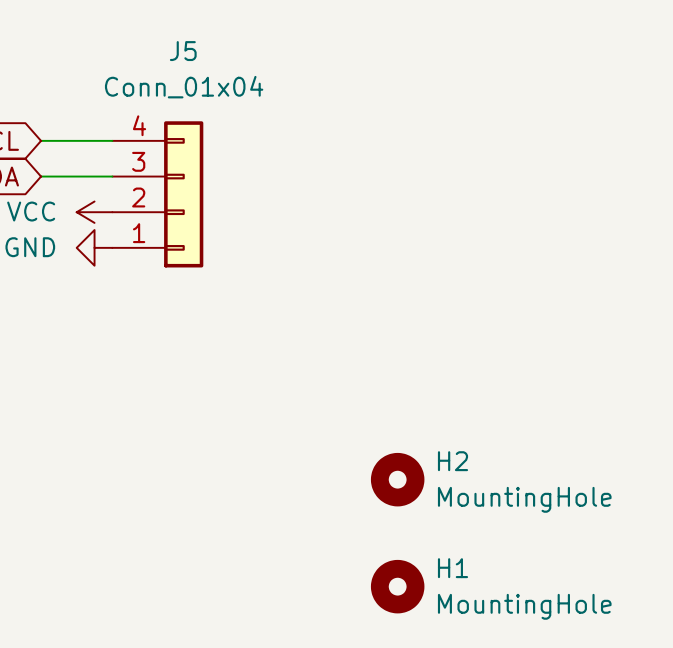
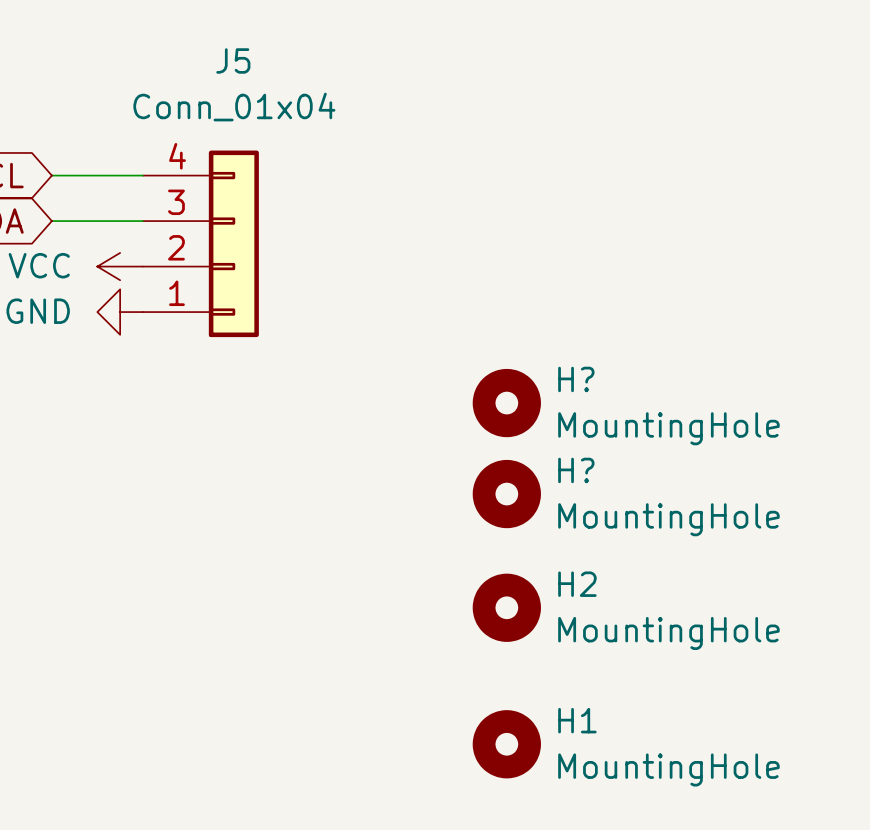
H?: none -> MountingHole (506, 403)
H?: none -> MountingHole (506, 494)

